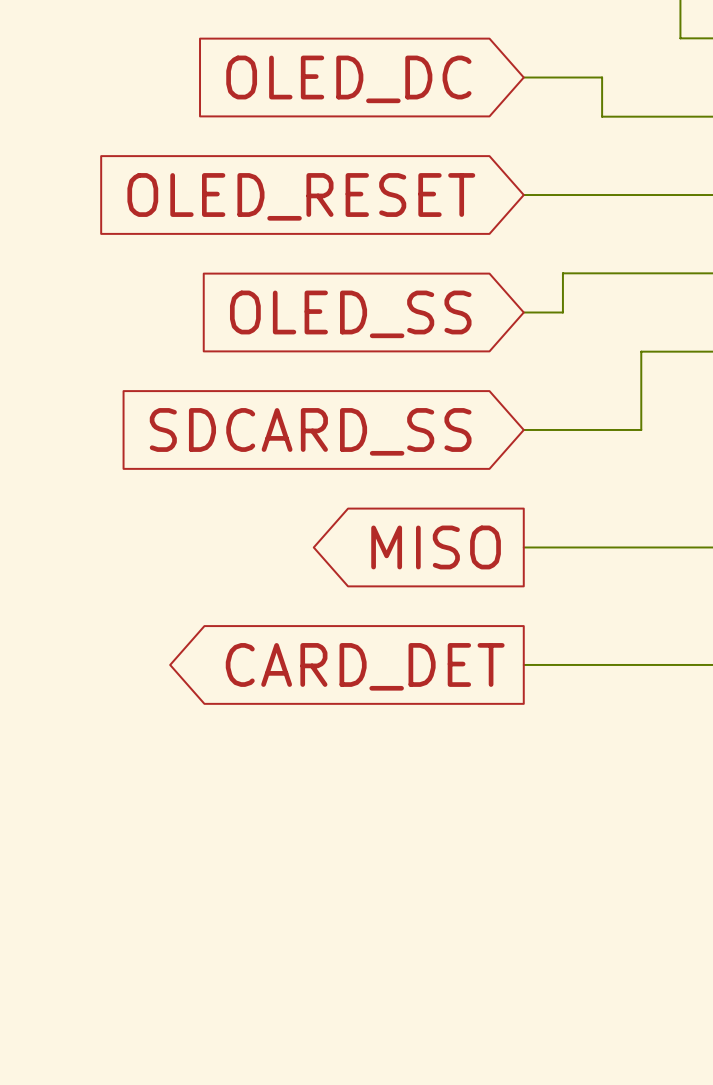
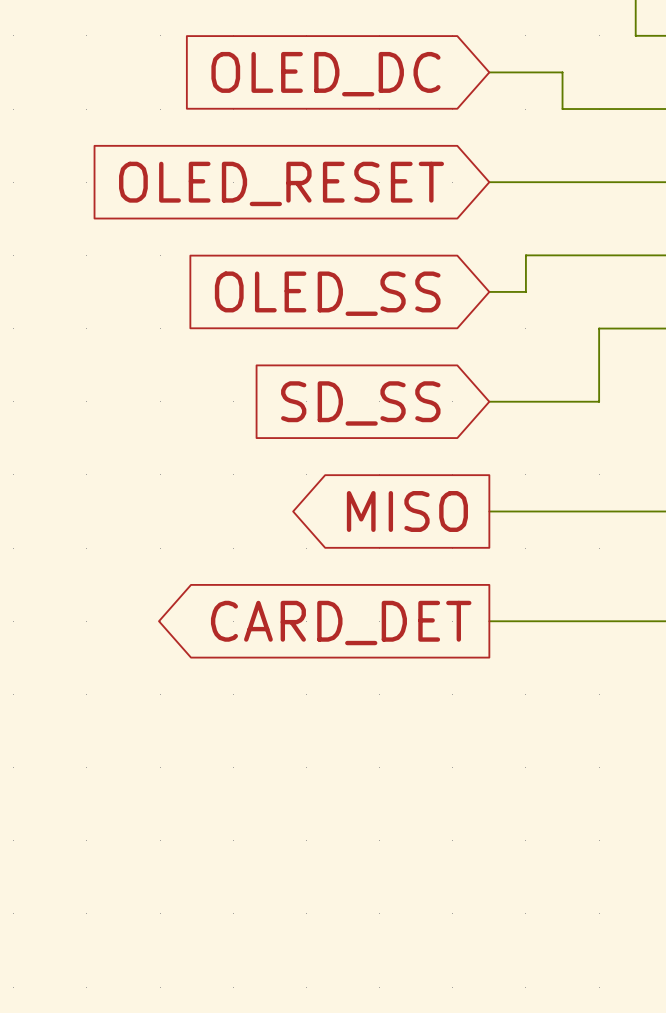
global label: SDCARD_SS (310, 431) -> SD_SS (360, 403)

